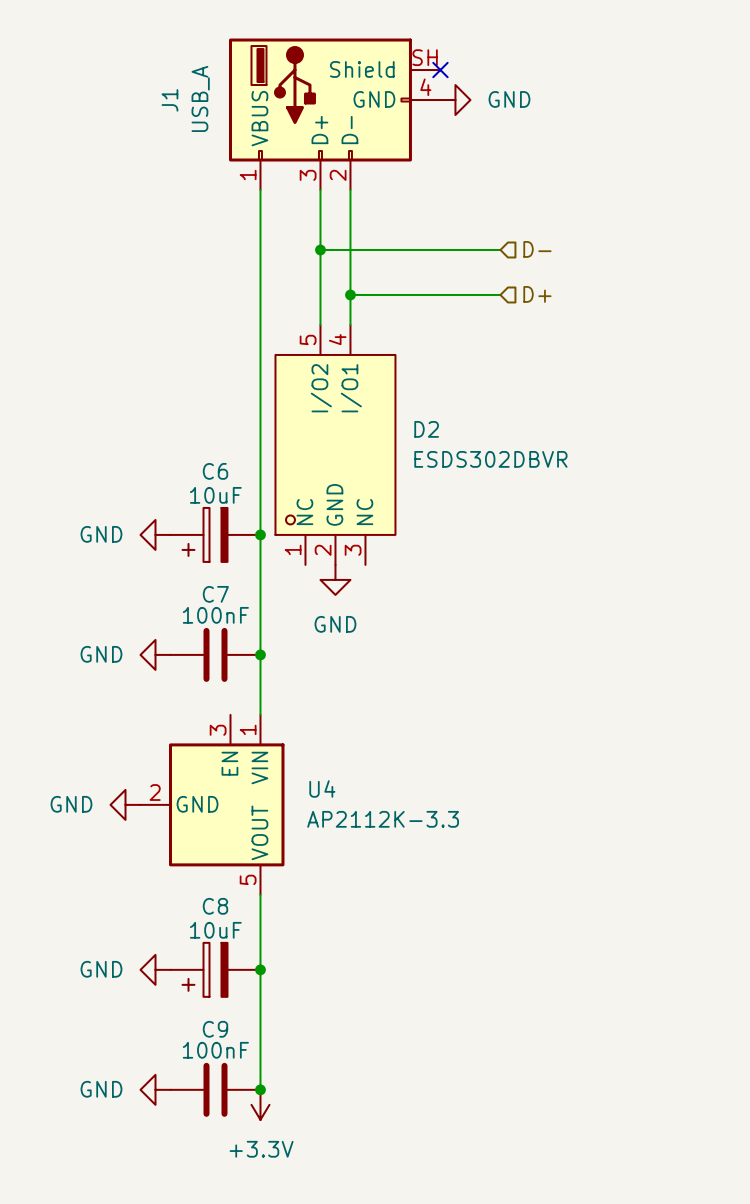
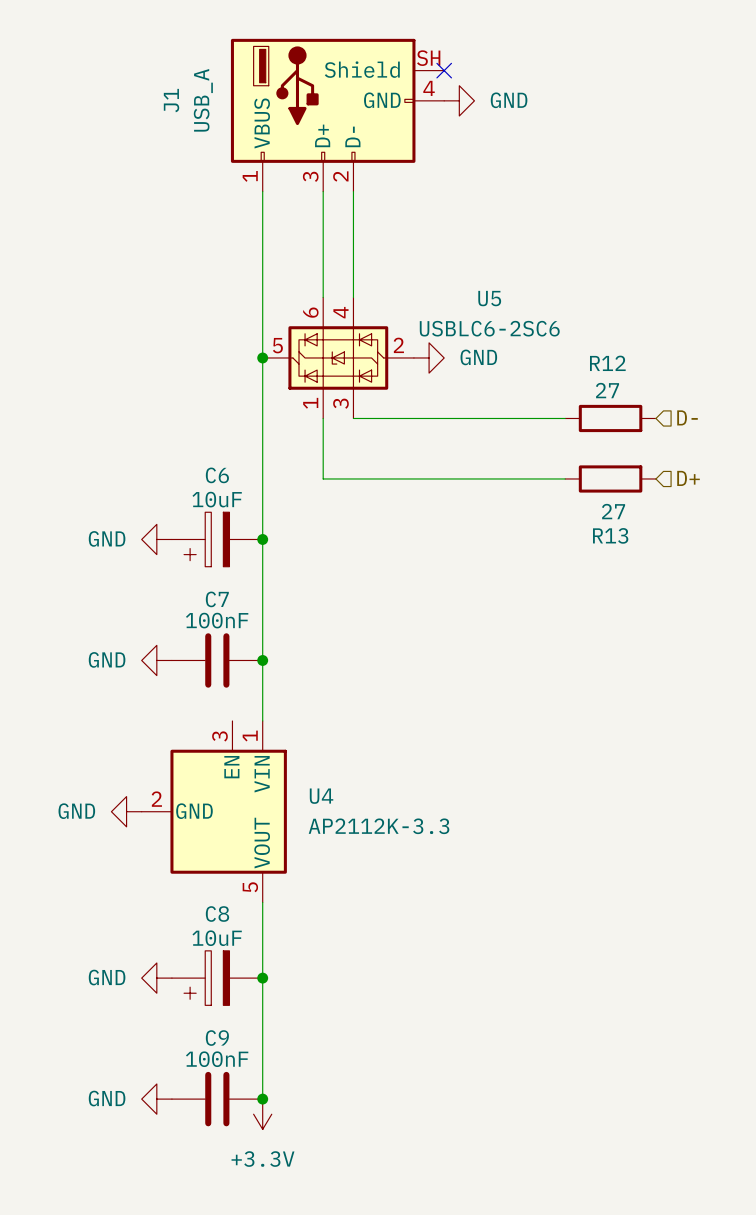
wire: (320, 249) (500, 249) -> none
junction: (320, 249) -> none
hierarchical label position: D- (537, 249) -> D- (687, 417)
junction: (350, 294) -> none
wire: (500, 294) (350, 294) (350, 324) -> none
hierarchical label position: D+ (537, 294) -> D+ (688, 478)
junction: none -> (262, 357)
U5: none -> USBLC6-2SC6 (338, 357)
wire: none -> (323, 418) (323, 478) (565, 478)
wire: none -> (353, 418) (565, 418)
R12: none -> 27 (610, 418)
D2: ESDS302DBVR (335, 444) -> none
R13: none -> 27 (610, 478)
power symbol rotation: 0° (335, 579) -> 90° counterclockwise (429, 357)
power symbol position: GND (335, 579) -> GND (429, 357)

